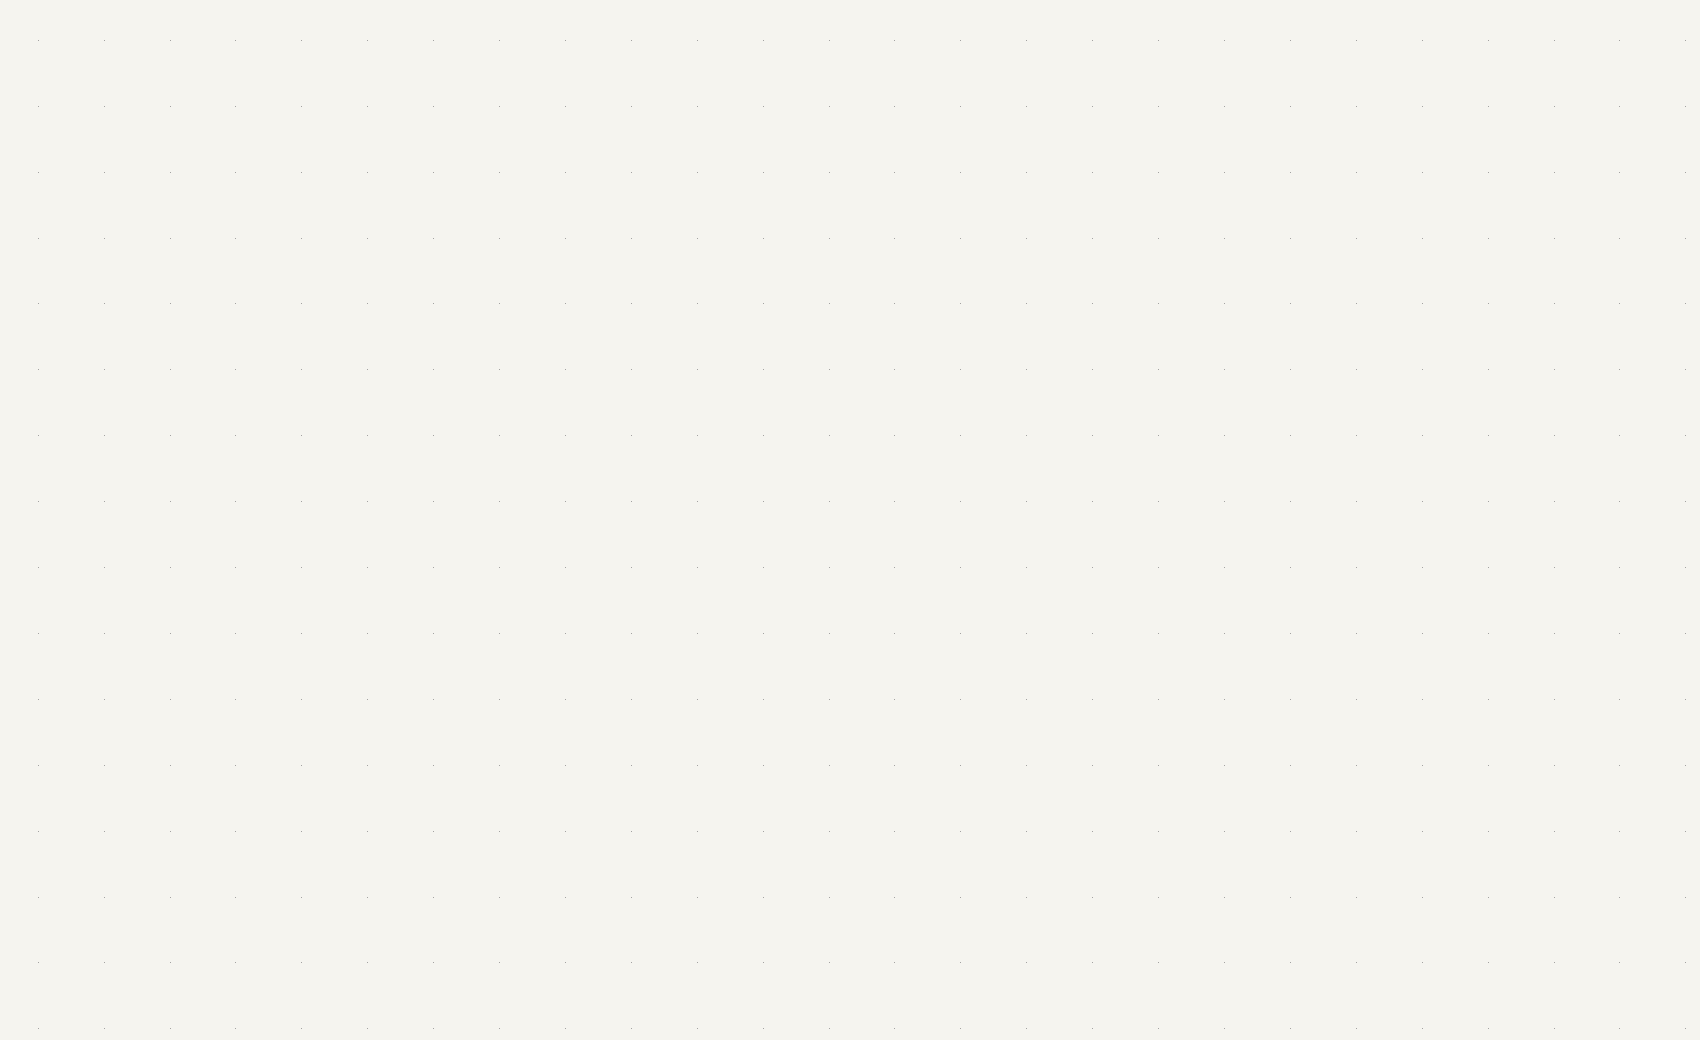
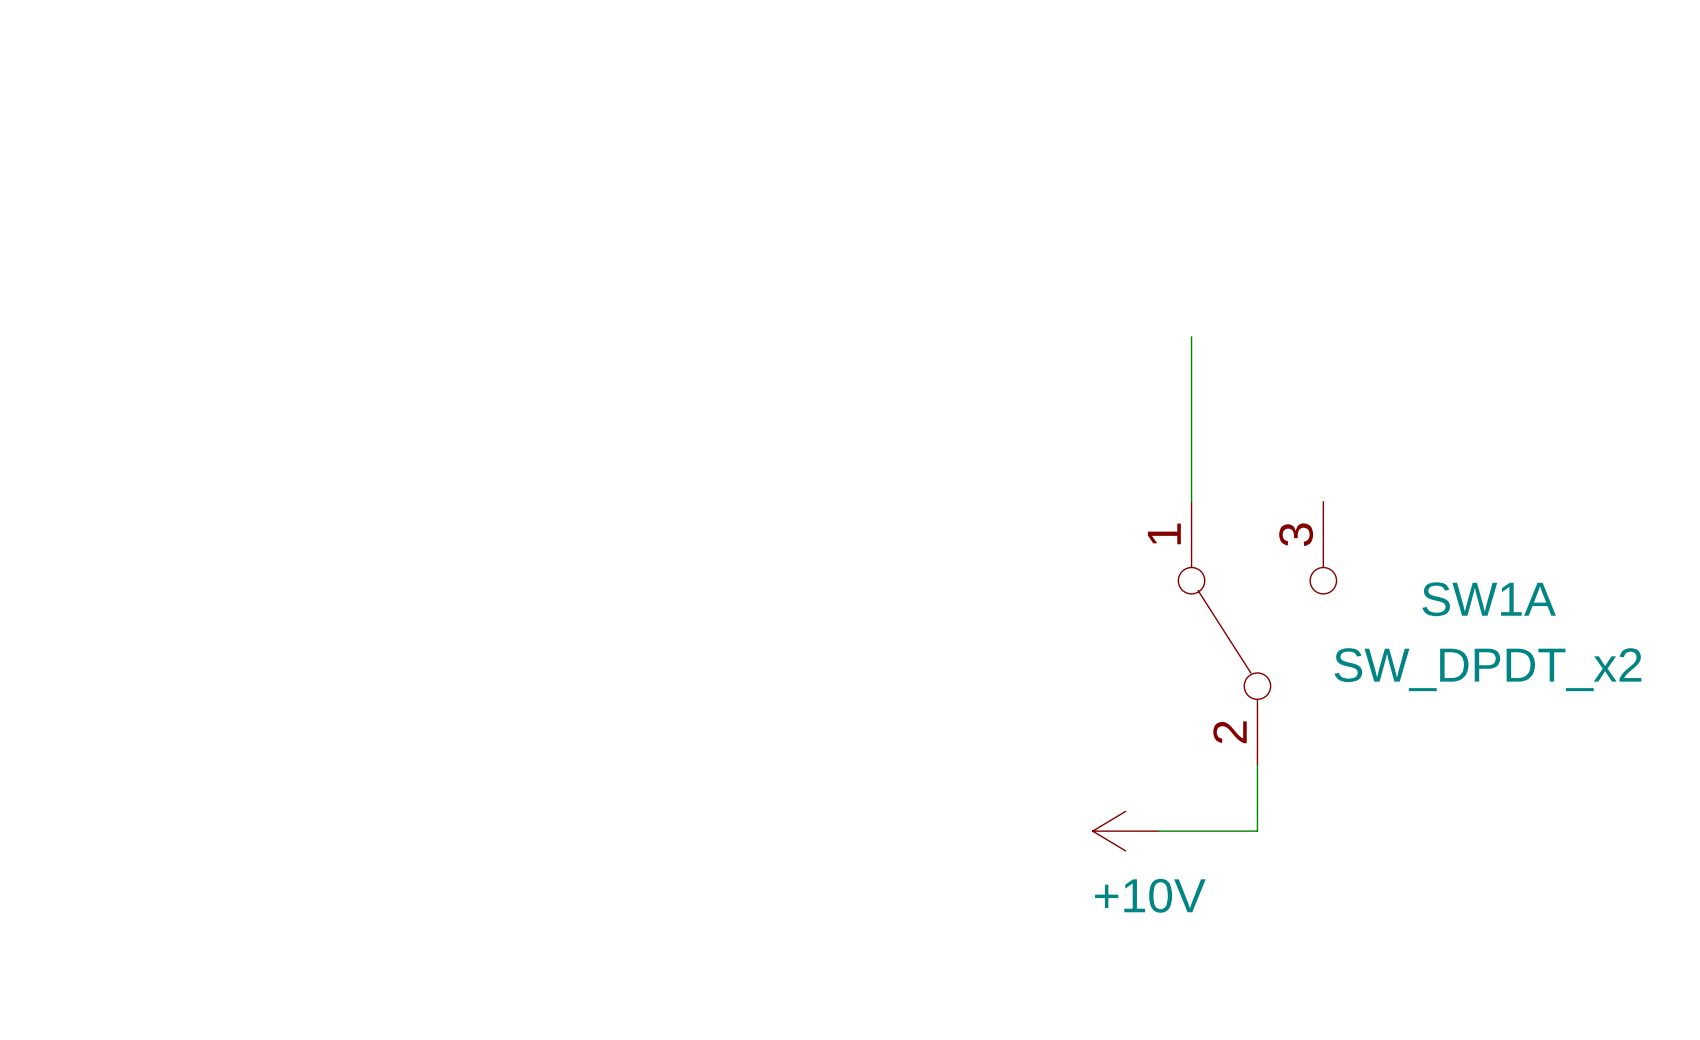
wire: none -> (1191, 336) (1191, 501)
SW1A: none -> SW_DPDT_x2 (1257, 633)
wire: none -> (1257, 765) (1257, 831) (1158, 831)
power symbol: none -> +10V (1125, 831)

